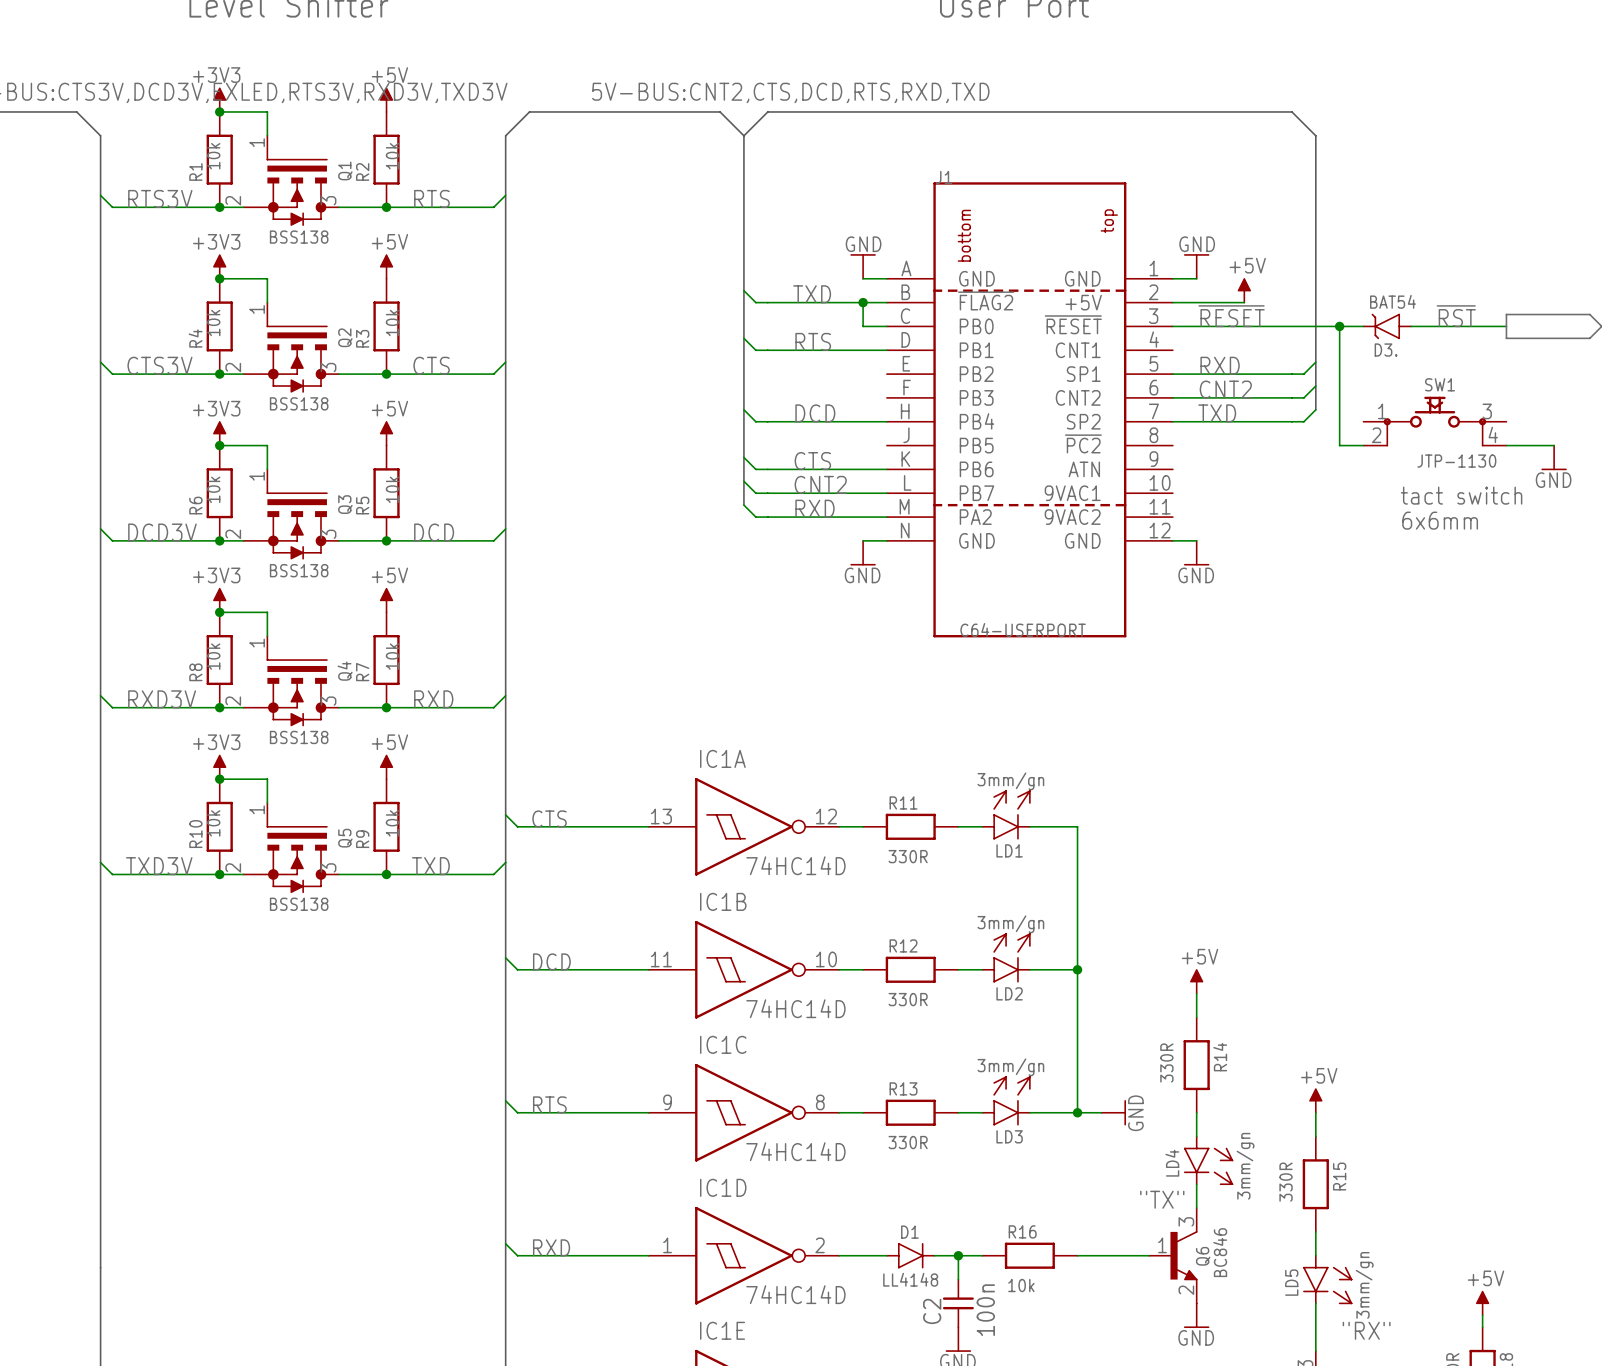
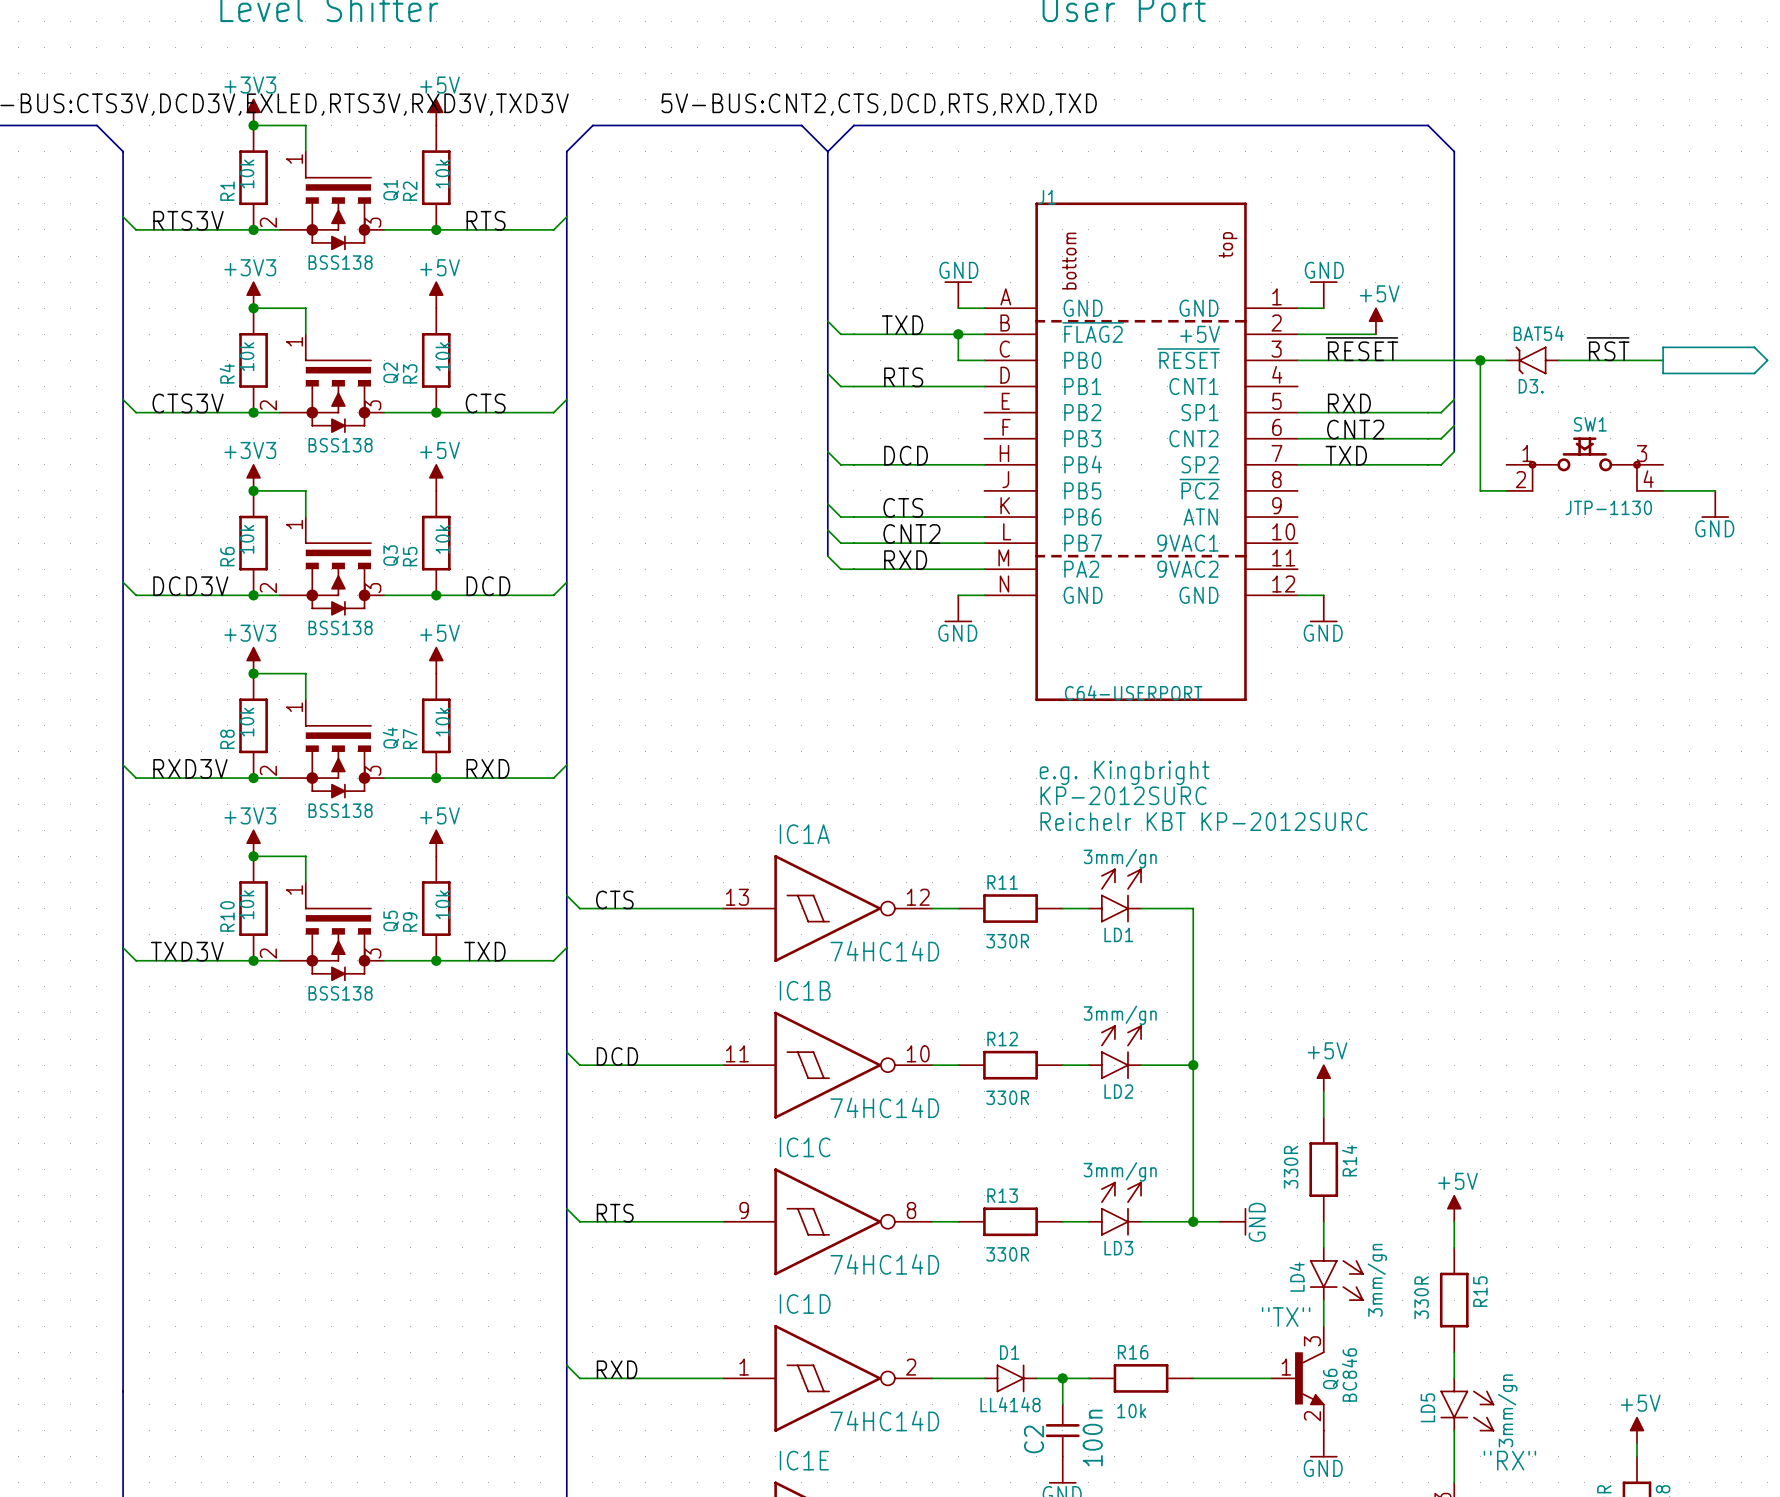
text: tact switch (1461, 495) -> none
text: 6x6mm (1440, 520) -> none
text: none -> e.g. Kingbright (1124, 772)
text: none -> KP-2012SURC (1123, 795)
text: none -> Reichelr KBT KP-2012SURC (1204, 821)

